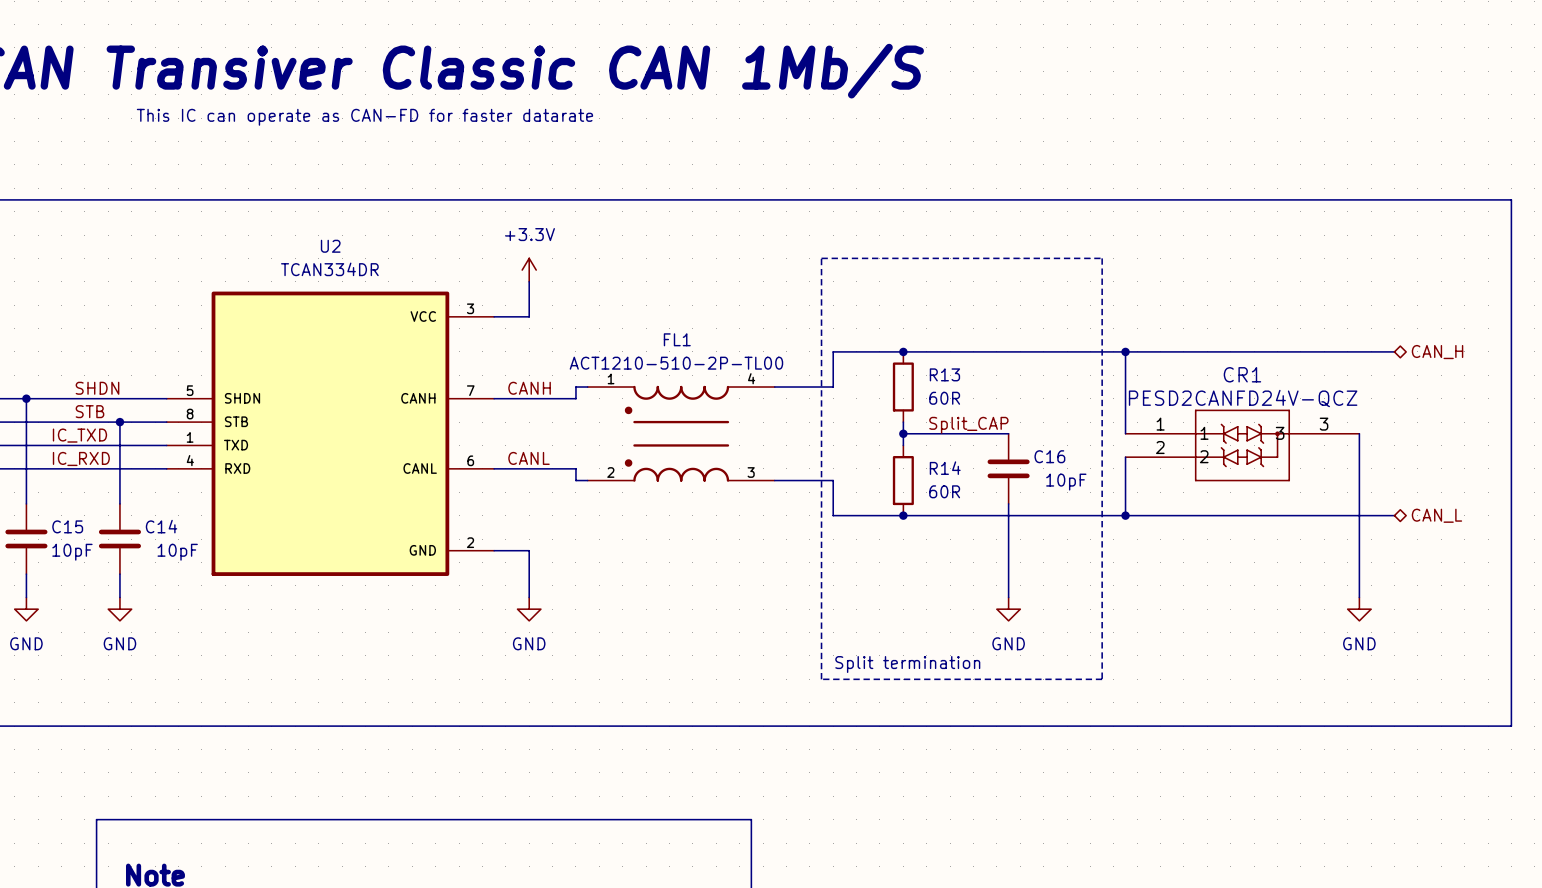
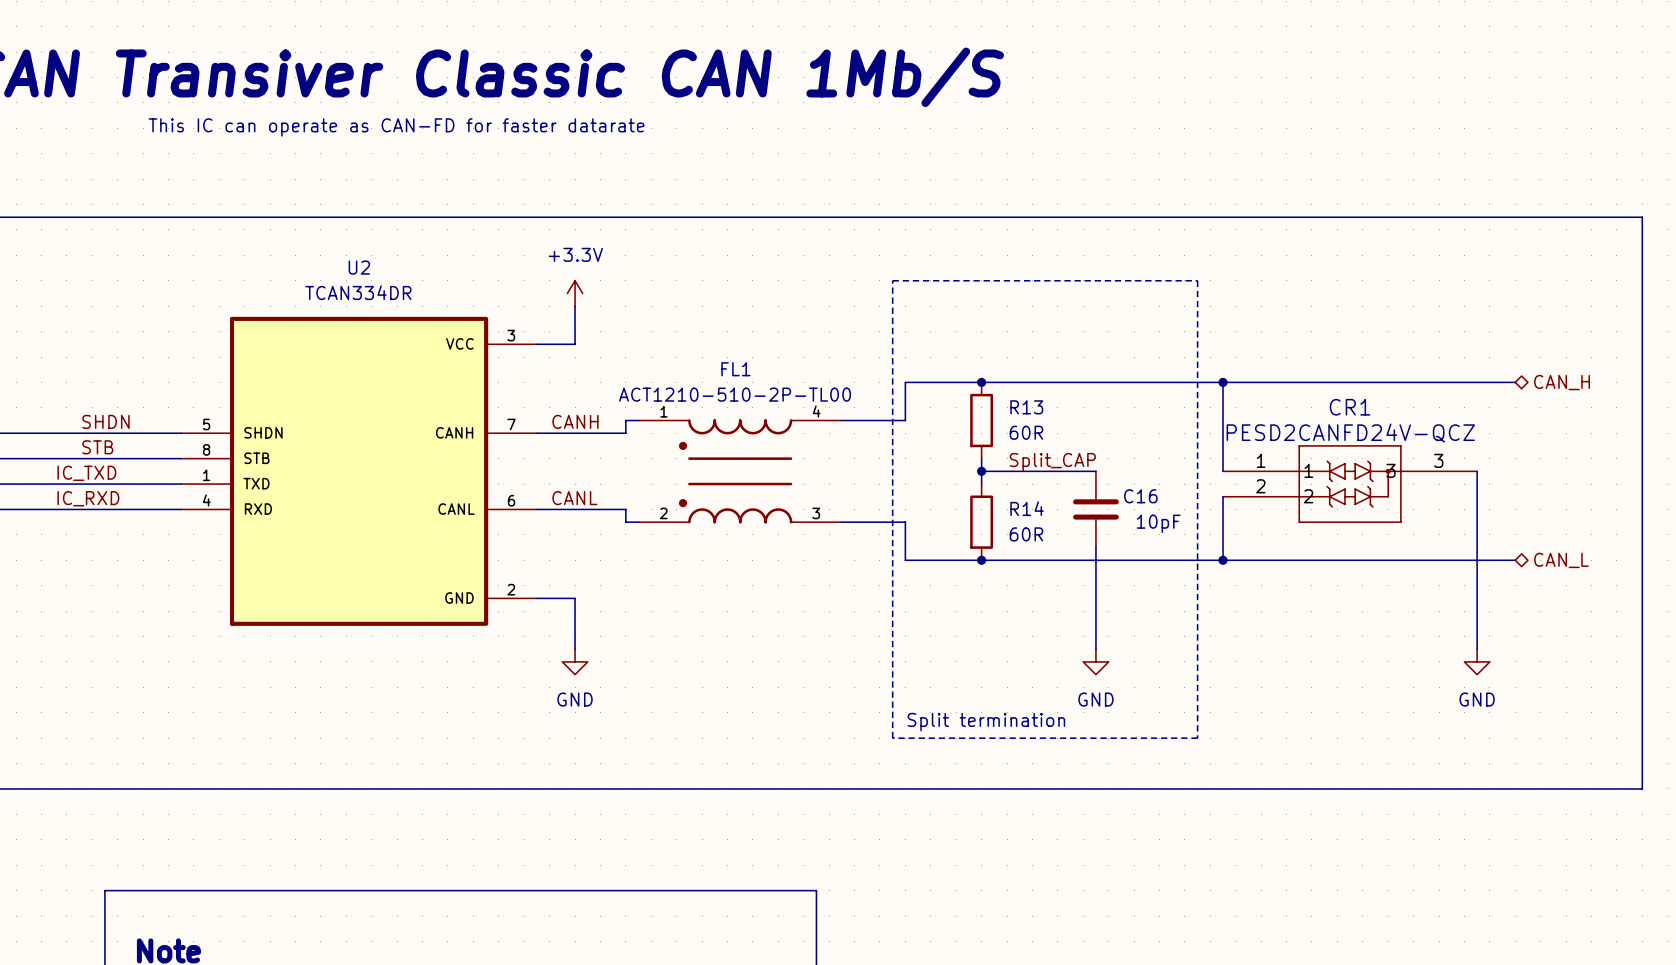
wire: (26, 398) (26, 503) -> none
junction: (26, 398) -> none
wire: (119, 422) (119, 503) -> none
junction: (119, 422) -> none
C15: 10pF (26, 539) -> none
C14: 10pF (119, 539) -> none
wire: (26, 574) (26, 597) -> none
wire: (119, 574) (119, 597) -> none
power symbol: GND (26, 609) -> none
power symbol: GND (119, 609) -> none

